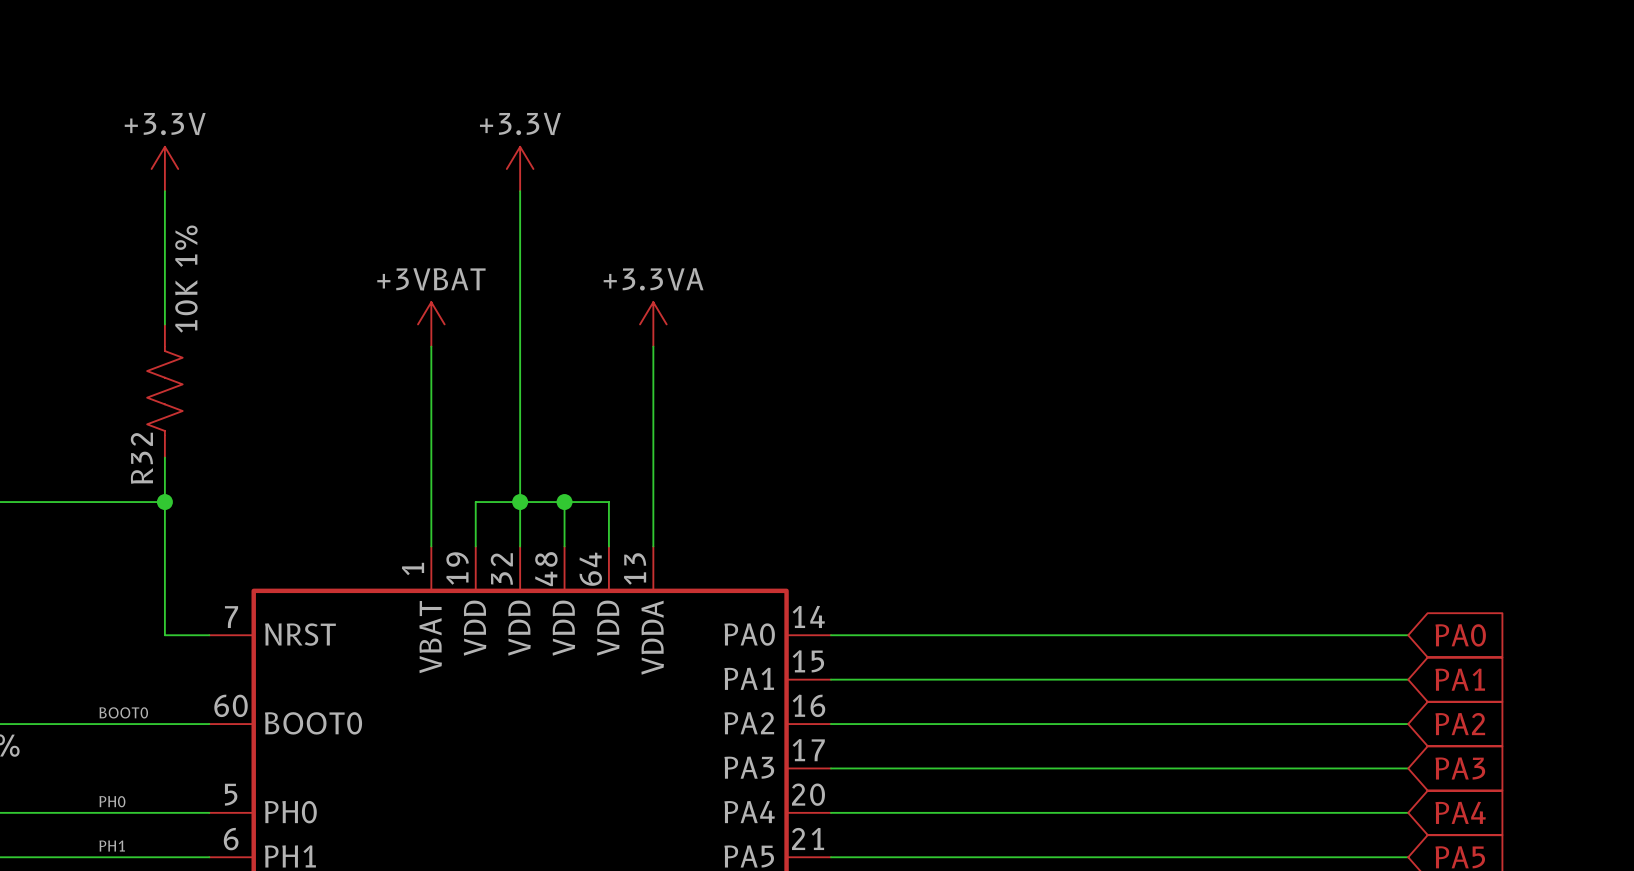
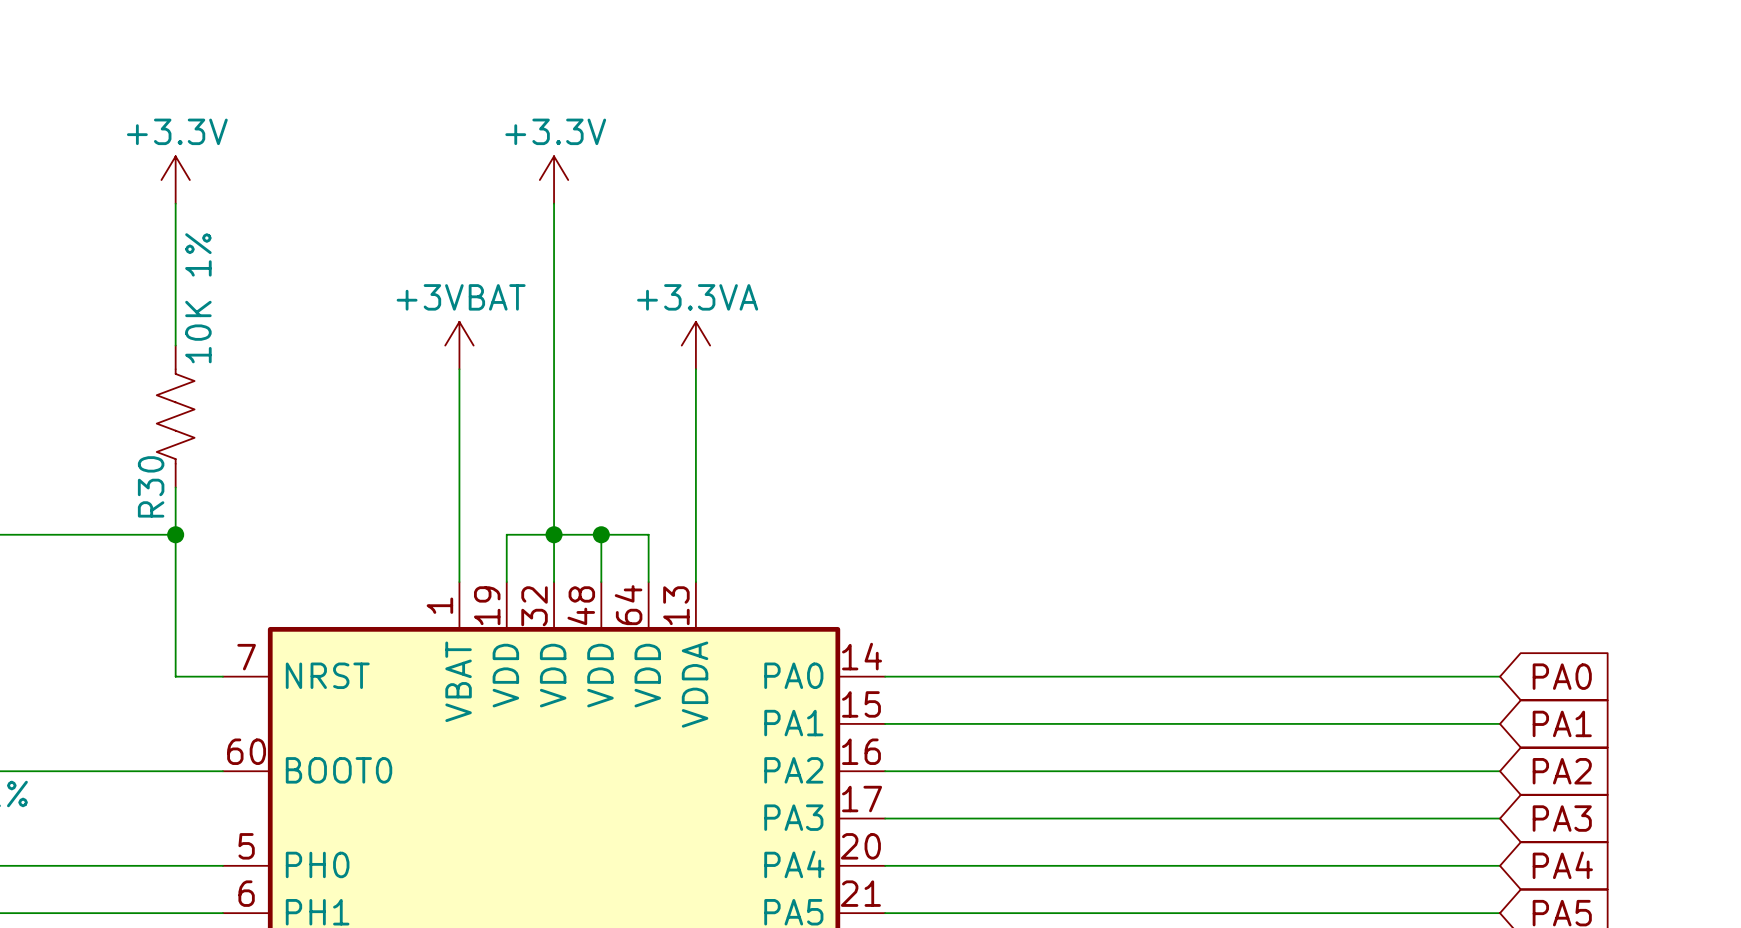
R32 name: R32 (141, 458) -> R30 (151, 486)
label: BOOT0 (123, 712) -> none
label: PH0 (112, 801) -> none
label: PH1 (112, 846) -> none

